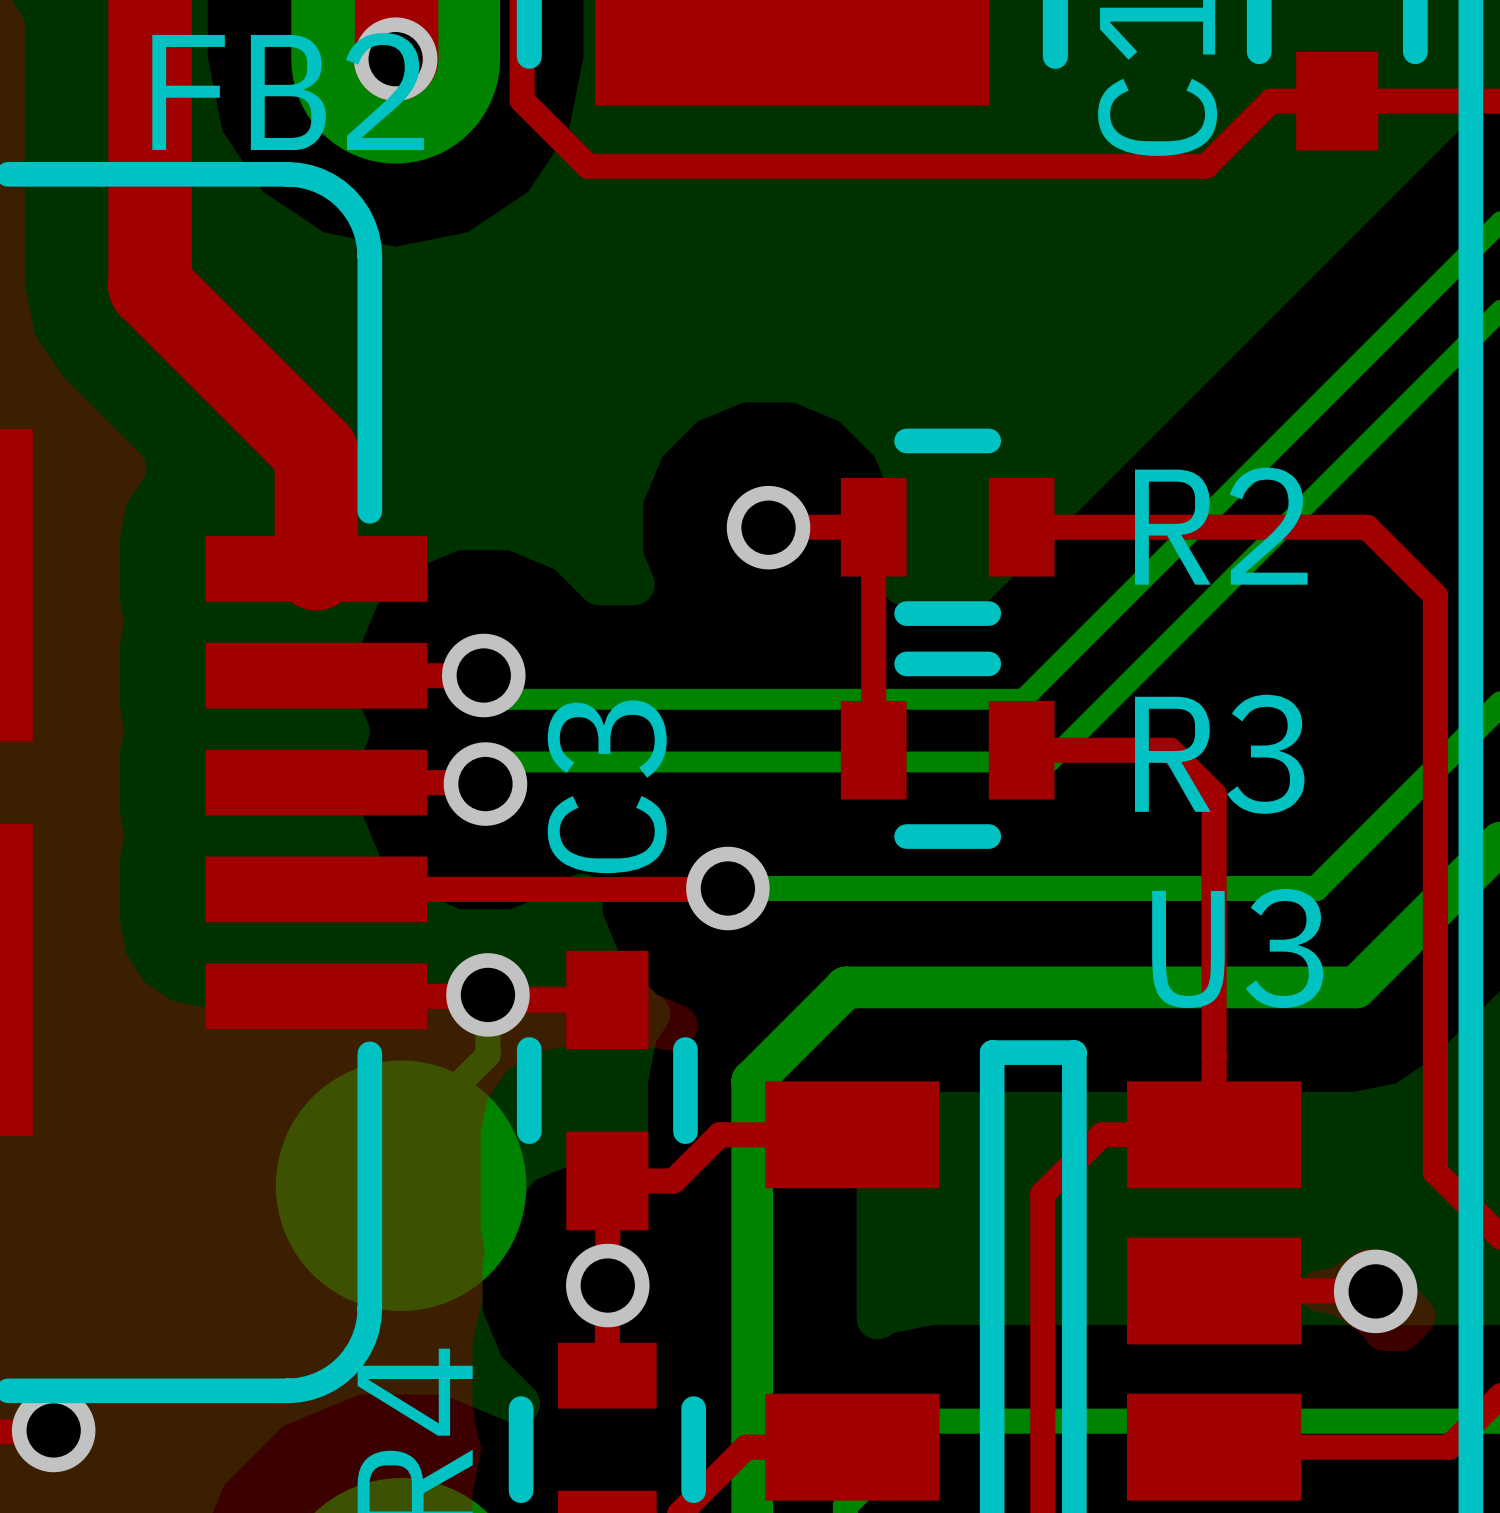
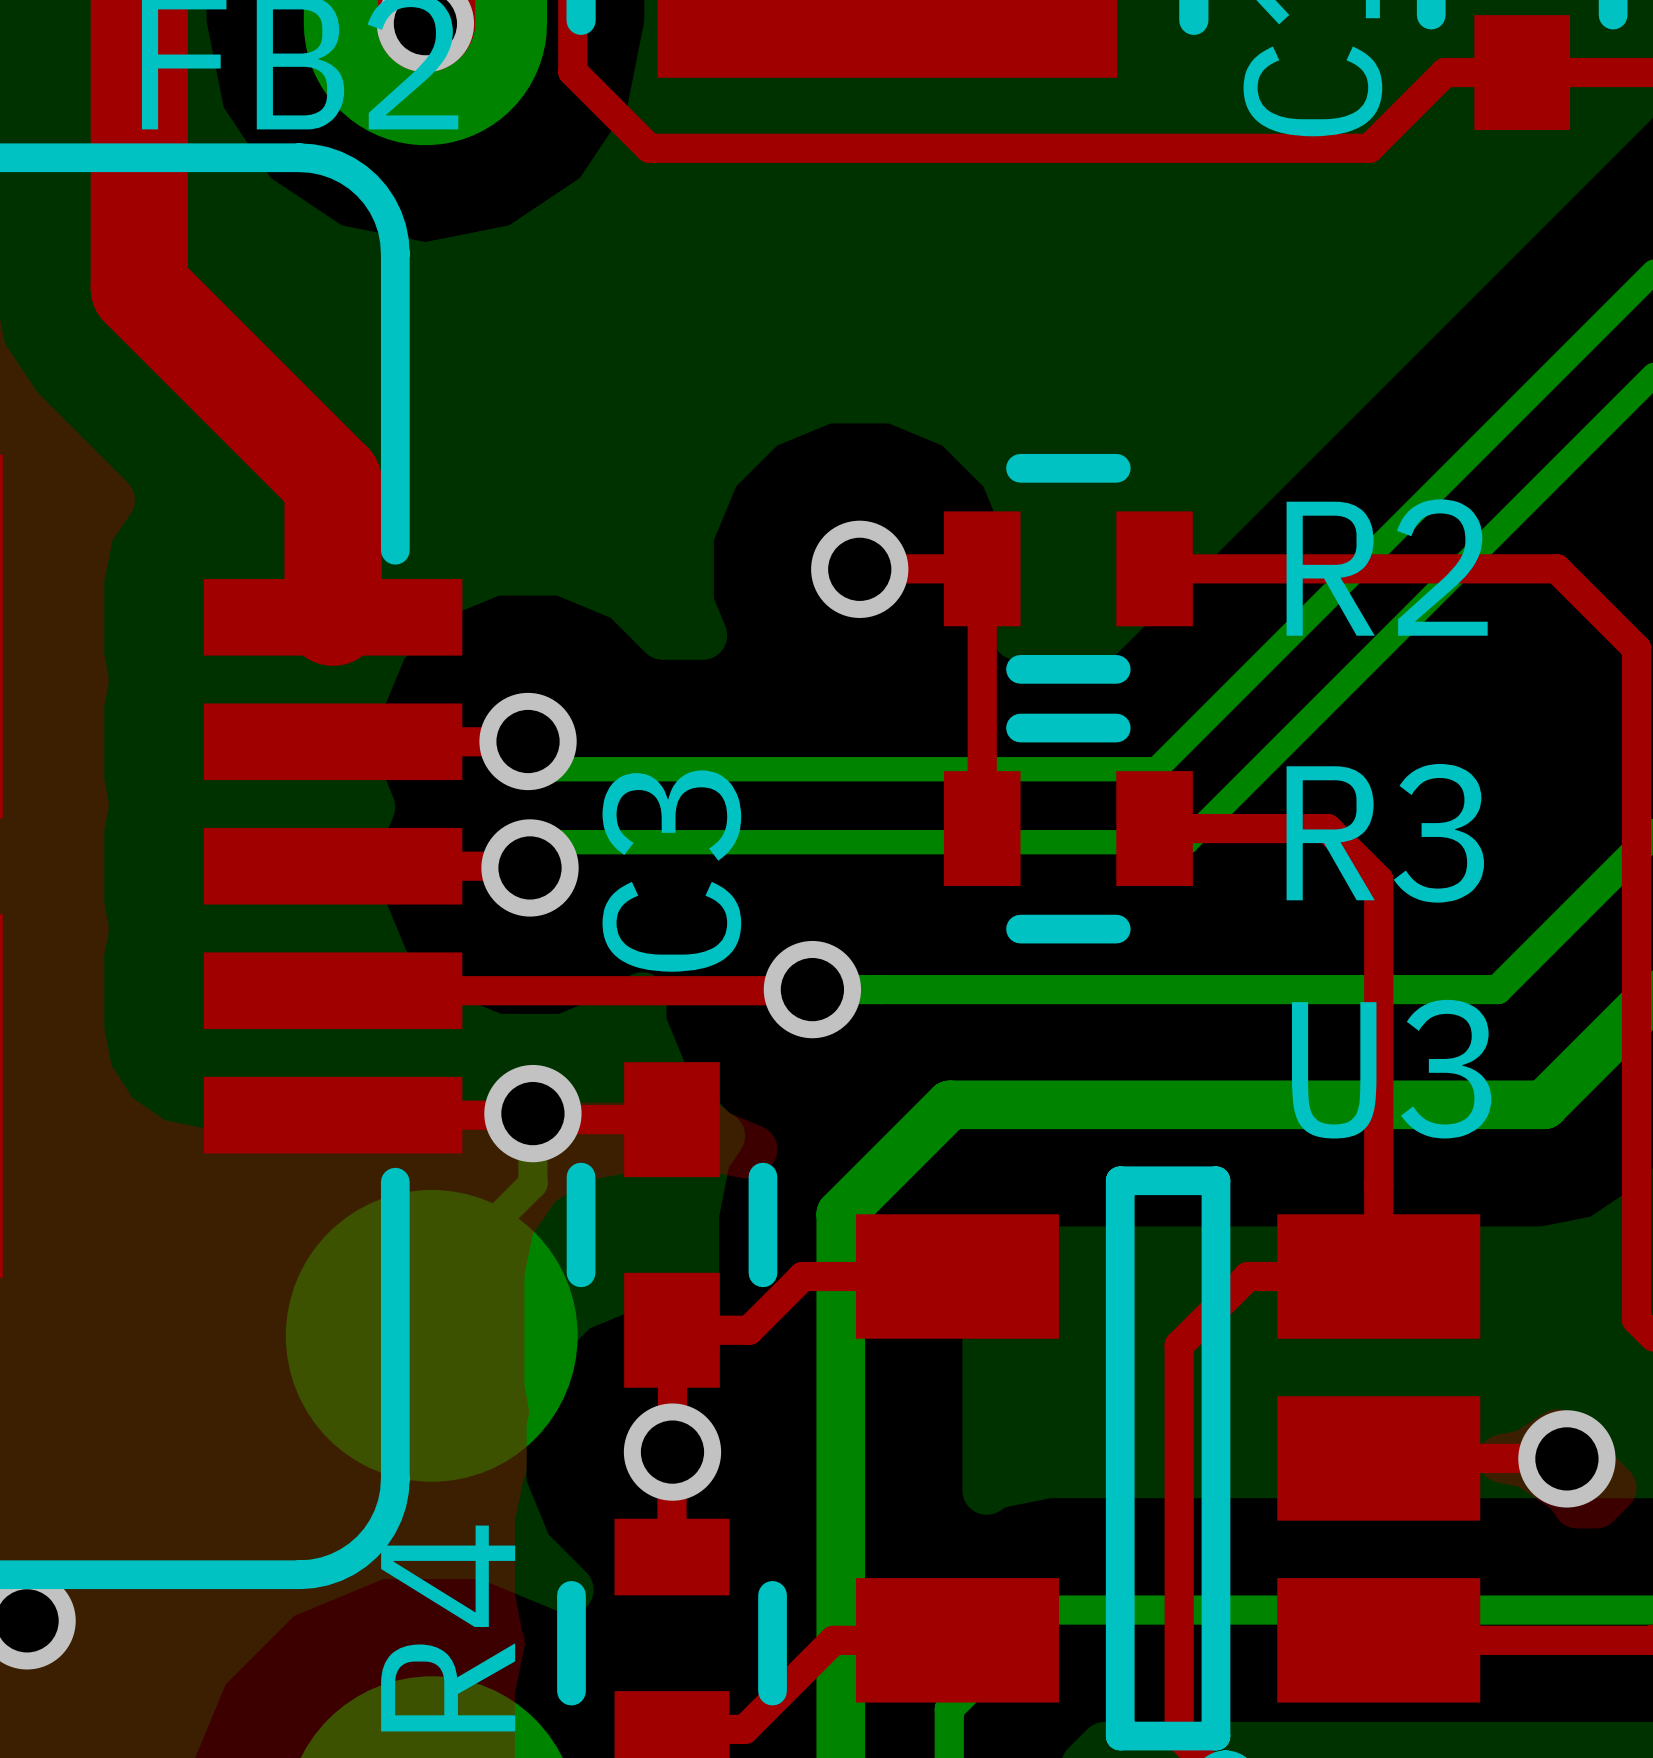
U3 name position: U3 (1237, 948) -> U3 (1391, 1069)

